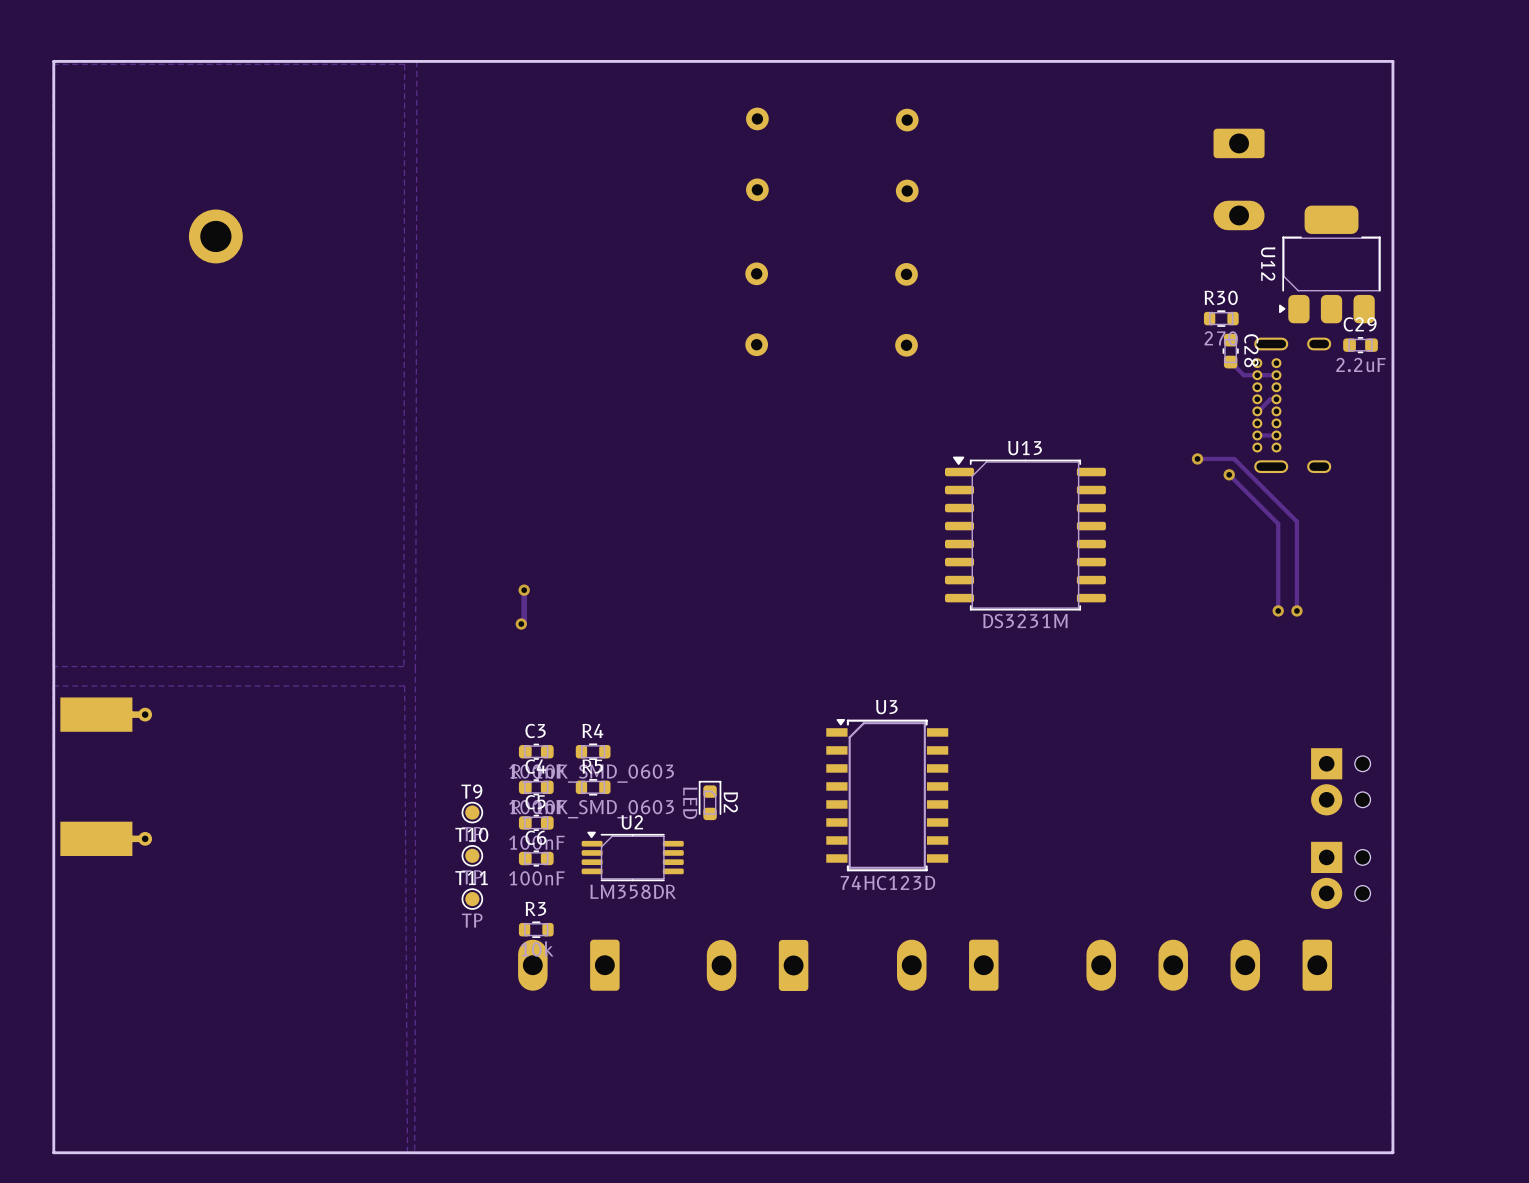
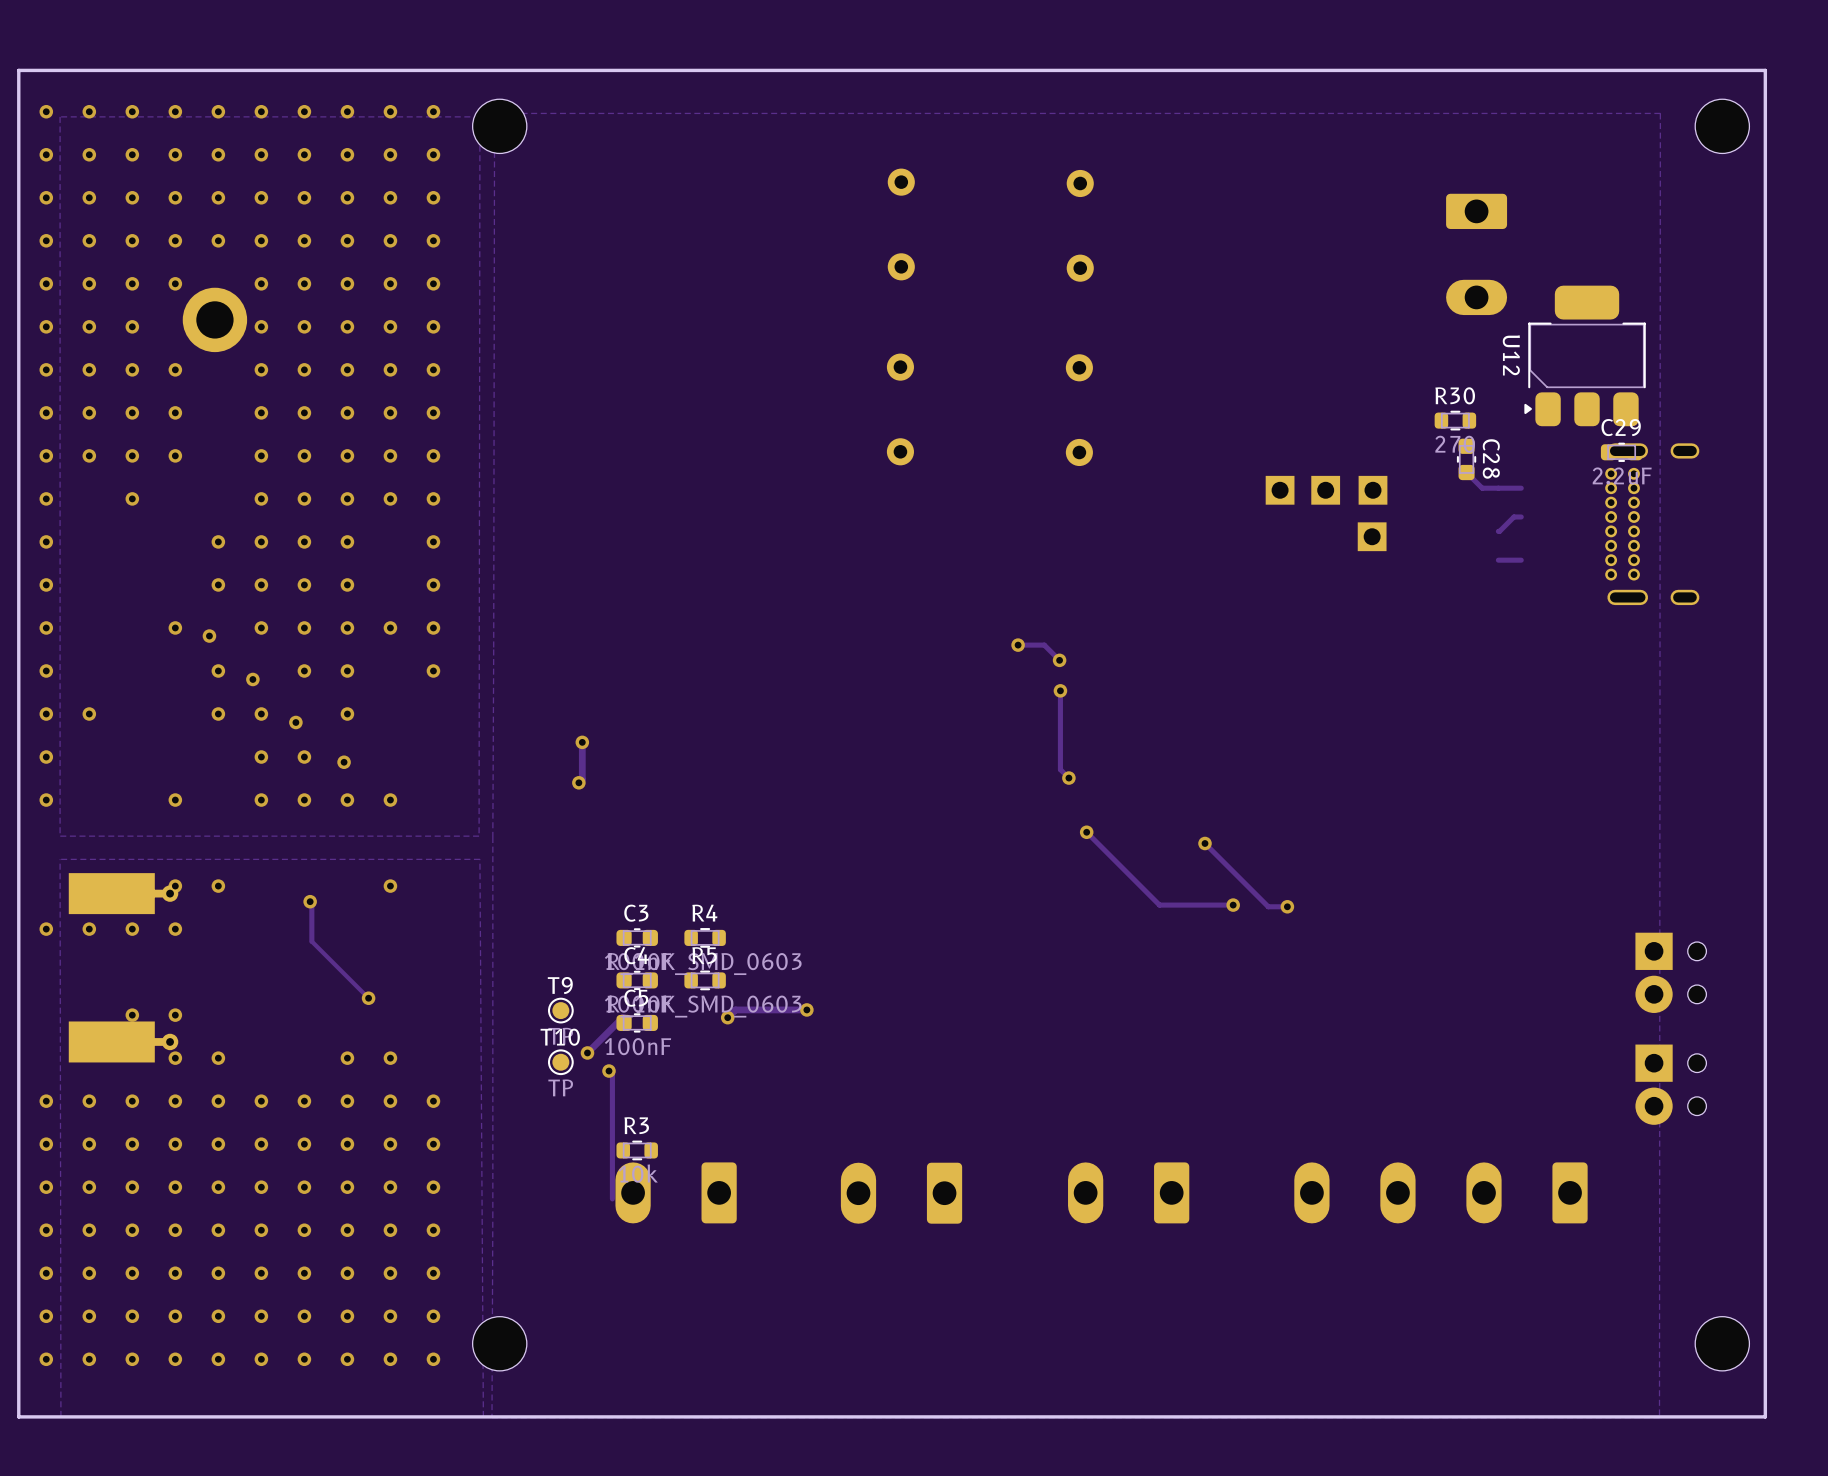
via: none -> (46, 111)
via: none -> (89, 111)
via: none -> (132, 111)
via: none -> (175, 111)
via: none -> (218, 111)
via: none -> (261, 111)
via: none -> (304, 111)
via: none -> (347, 111)
via: none -> (390, 111)
via: none -> (433, 111)
part: none -> (499, 126)
part: none -> (1722, 126)
via: none -> (46, 154)
via: none -> (89, 154)
via: none -> (132, 154)
via: none -> (175, 154)
via: none -> (218, 154)
via: none -> (261, 154)
via: none -> (304, 154)
via: none -> (347, 154)
via: none -> (390, 154)
via: none -> (433, 154)
via: none -> (46, 197)
via: none -> (89, 197)
via: none -> (132, 197)
via: none -> (175, 197)
via: none -> (218, 197)
via: none -> (261, 197)
via: none -> (304, 197)
via: none -> (347, 197)
via: none -> (390, 197)
via: none -> (433, 197)
via: none -> (46, 240)
via: none -> (89, 240)
via: none -> (132, 240)
via: none -> (175, 240)
via: none -> (218, 240)
via: none -> (261, 240)
via: none -> (304, 240)
via: none -> (347, 240)
via: none -> (390, 240)
via: none -> (433, 240)
via: none -> (46, 283)
via: none -> (89, 283)
via: none -> (132, 283)
via: none -> (175, 283)
via: none -> (261, 283)
via: none -> (304, 283)
via: none -> (347, 283)
via: none -> (390, 283)
via: none -> (433, 283)
part position: (215, 236) -> (214, 319)
via: none -> (46, 326)
via: none -> (89, 326)
via: none -> (132, 326)
via: none -> (261, 326)
via: none -> (304, 326)
via: none -> (347, 326)
via: none -> (390, 326)
via: none -> (433, 326)
via: none -> (46, 369)
via: none -> (89, 369)
via: none -> (132, 369)
via: none -> (175, 369)
via: none -> (261, 369)
via: none -> (304, 369)
via: none -> (347, 369)
via: none -> (390, 369)
via: none -> (433, 369)
via: none -> (46, 412)
via: none -> (89, 412)
via: none -> (132, 412)
via: none -> (175, 412)
via: none -> (261, 412)
via: none -> (304, 412)
via: none -> (347, 412)
via: none -> (390, 412)
via: none -> (433, 412)
via: none -> (46, 455)
via: none -> (89, 455)
via: none -> (132, 455)
via: none -> (175, 455)
via: none -> (261, 455)
via: none -> (304, 455)
via: none -> (347, 455)
via: none -> (390, 455)
via: none -> (433, 455)
part: none -> (1280, 490)
part: none -> (1325, 490)
part: none -> (1373, 490)
via: none -> (46, 498)
via: none -> (132, 498)
via: none -> (261, 498)
via: none -> (304, 498)
via: none -> (347, 498)
via: none -> (390, 498)
via: none -> (433, 498)
part position: (1291, 405) -> (1652, 524)
part: none -> (1372, 536)
via: none -> (46, 541)
via: none -> (218, 541)
via: none -> (261, 541)
via: none -> (304, 541)
via: none -> (347, 541)
via: none -> (433, 541)
via: none -> (46, 584)
via: none -> (218, 584)
via: none -> (261, 584)
via: none -> (304, 584)
via: none -> (347, 584)
via: none -> (433, 584)
track: (1197, 458) (1234, 458) (1296, 521) (1296, 610) -> none
via: (1197, 458) -> none
track: (1229, 474) (1278, 523) (1278, 610) -> none
via: (1229, 474) -> none
via: none -> (46, 627)
via: none -> (175, 627)
via: none -> (261, 627)
via: none -> (304, 627)
via: none -> (347, 627)
via: none -> (390, 627)
via: none -> (433, 627)
via: none -> (209, 636)
track: none -> (1018, 645) (1044, 645) (1059, 660)
via: none -> (1018, 645)
via: none -> (1059, 660)
via: none -> (46, 670)
via: none -> (218, 670)
via: none -> (304, 670)
via: none -> (347, 670)
via: none -> (433, 670)
U13: DS3231M (1025, 533) -> none
via: none -> (252, 679)
track: none -> (1060, 690) (1060, 769) (1068, 778)
via: none -> (1060, 690)
via: none -> (46, 714)
via: none -> (89, 714)
via: none -> (218, 714)
via: none -> (261, 714)
via: none -> (347, 714)
via: none -> (295, 722)
via: none -> (582, 742)
track: (524, 590) (524, 621) (521, 624) -> (582, 742) (582, 779) (578, 782)
via: (524, 590) -> none
via: none -> (46, 757)
via: none -> (261, 757)
via: none -> (304, 757)
via: none -> (344, 762)
via: (1278, 610) -> none
via: (1296, 610) -> none
via: none -> (1068, 778)
via: none -> (578, 782)
via: (521, 624) -> none
via: none -> (46, 800)
via: none -> (175, 800)
via: none -> (261, 800)
via: none -> (304, 800)
via: none -> (347, 800)
via: none -> (390, 800)
track: none -> (1086, 832) (1159, 905) (1233, 905)
via: none -> (1086, 832)
track: none -> (1205, 843) (1268, 906) (1287, 906)
via: none -> (1205, 843)
via: none -> (175, 886)
via: none -> (218, 886)
via: none -> (390, 886)
track: none -> (310, 901) (311, 903) (311, 941) (368, 998)
via: none -> (310, 901)
via: none -> (1233, 905)
via: none -> (1287, 906)
via: none -> (46, 929)
via: none -> (89, 929)
via: none -> (132, 929)
via: none -> (175, 929)
part: none -> (1670, 972)
part: (1340, 781) -> none
U3: 74HC123D (887, 795) -> none
D2: LED (710, 800) -> none
via: none -> (368, 998)
track: none -> (806, 1009) (735, 1009) (727, 1017)
via: none -> (806, 1009)
via: none -> (132, 1015)
via: none -> (175, 1015)
track: none -> (624, 1017) (587, 1052)
via: none -> (727, 1017)
via: none -> (587, 1052)
via: none -> (175, 1058)
via: none -> (218, 1058)
via: none -> (347, 1058)
via: none -> (390, 1058)
U2: LM358DR (632, 856) -> none
C6: 100nF (536, 858) -> none
track: none -> (608, 1071) (612, 1074) (612, 1198)
via: none -> (608, 1071)
part: none -> (1670, 1084)
part: (1340, 875) -> none
via: none -> (46, 1101)
via: none -> (89, 1101)
via: none -> (132, 1101)
via: none -> (175, 1101)
via: none -> (218, 1101)
via: none -> (261, 1101)
via: none -> (304, 1101)
via: none -> (347, 1101)
via: none -> (390, 1101)
via: none -> (433, 1101)
T11: TP (472, 899) -> none
via: none -> (46, 1144)
via: none -> (89, 1144)
via: none -> (132, 1144)
via: none -> (175, 1144)
via: none -> (218, 1144)
via: none -> (261, 1144)
via: none -> (304, 1144)
via: none -> (347, 1144)
via: none -> (390, 1144)
via: none -> (433, 1144)
via: none -> (46, 1187)
via: none -> (89, 1187)
via: none -> (132, 1187)
via: none -> (175, 1187)
via: none -> (218, 1187)
via: none -> (261, 1187)
via: none -> (304, 1187)
via: none -> (347, 1187)
via: none -> (390, 1187)
via: none -> (433, 1187)
via: none -> (46, 1230)
via: none -> (89, 1230)
via: none -> (132, 1230)
via: none -> (175, 1230)
via: none -> (218, 1230)
via: none -> (261, 1230)
via: none -> (304, 1230)
via: none -> (347, 1230)
via: none -> (390, 1230)
via: none -> (433, 1230)
via: none -> (46, 1273)
via: none -> (89, 1273)
via: none -> (132, 1273)
via: none -> (175, 1273)
via: none -> (218, 1273)
via: none -> (261, 1273)
via: none -> (304, 1273)
via: none -> (347, 1273)
via: none -> (390, 1273)
via: none -> (433, 1273)
via: none -> (46, 1316)
via: none -> (89, 1316)
via: none -> (132, 1316)
via: none -> (175, 1316)
via: none -> (218, 1316)
via: none -> (261, 1316)
via: none -> (304, 1316)
via: none -> (347, 1316)
via: none -> (390, 1316)
via: none -> (433, 1316)
part: none -> (499, 1343)
part: none -> (1722, 1343)
via: none -> (46, 1359)
via: none -> (89, 1359)
via: none -> (132, 1359)
via: none -> (175, 1359)
via: none -> (218, 1359)
via: none -> (261, 1359)
via: none -> (304, 1359)
via: none -> (347, 1359)
via: none -> (390, 1359)
via: none -> (433, 1359)
board edge: (1392, 1152) (1392, 61) (53, 61) (53, 1152) -> (1660, 1416) (1765, 1416) (1765, 70) (18, 70) (18, 1416) (60, 1416)

